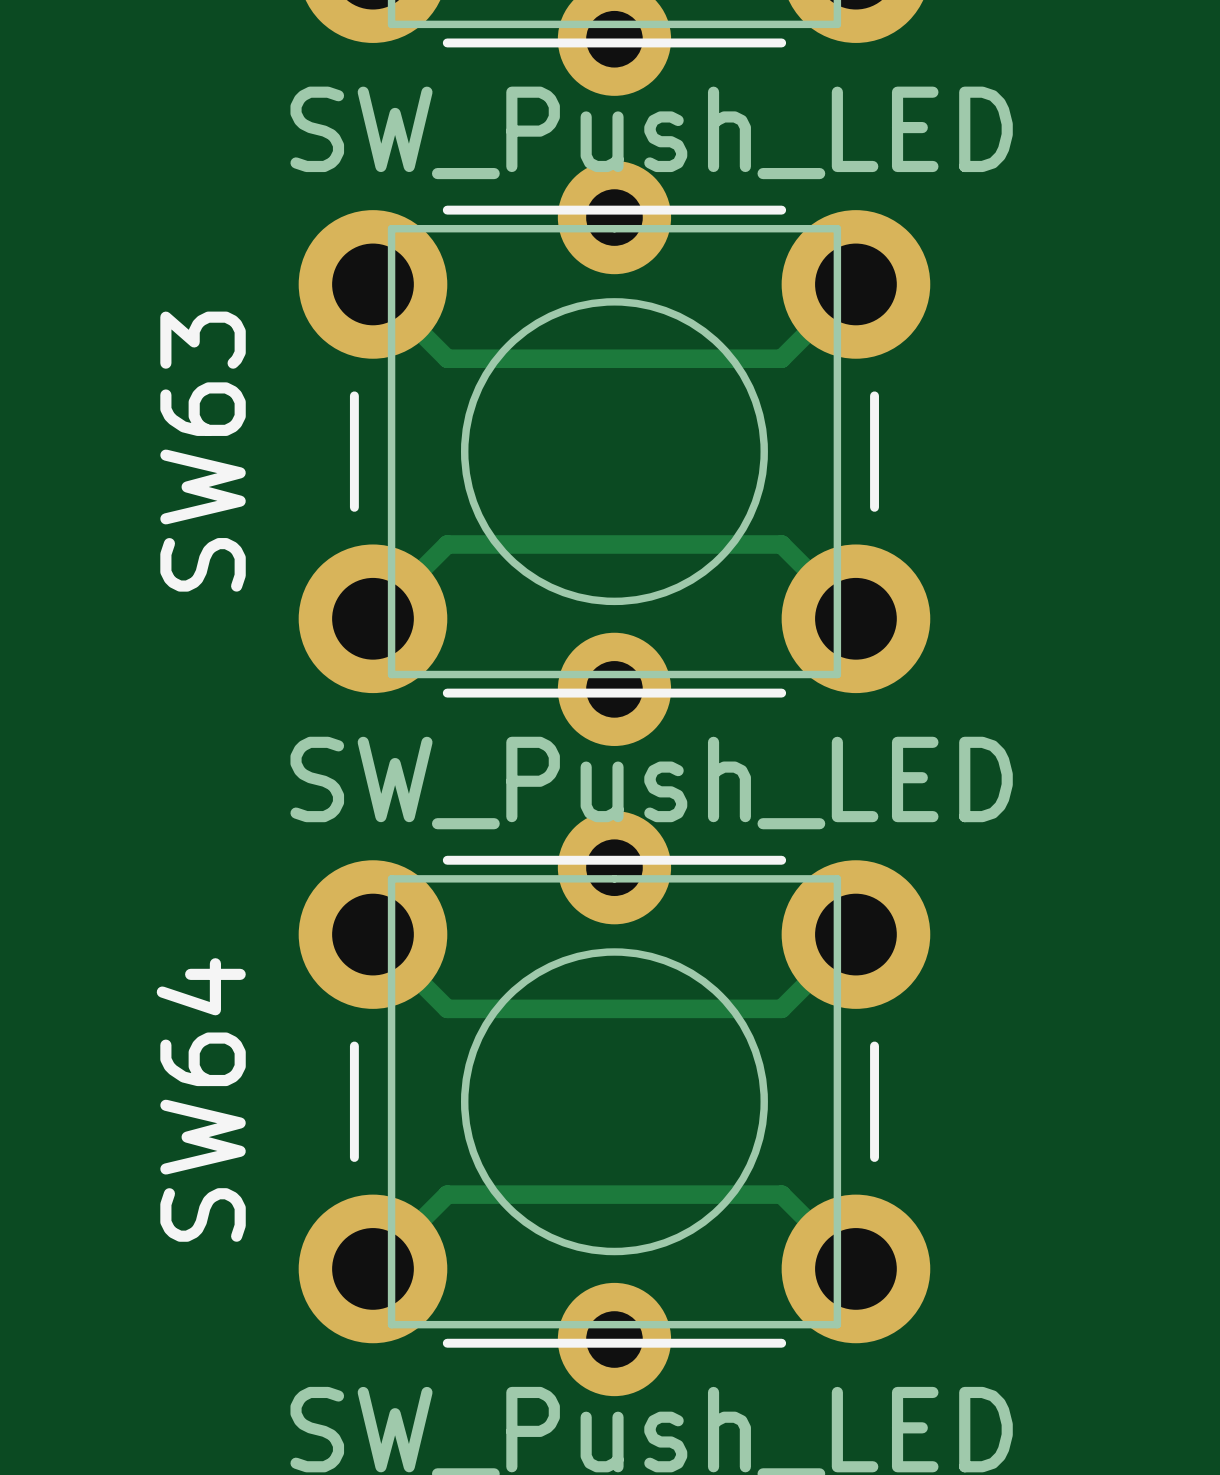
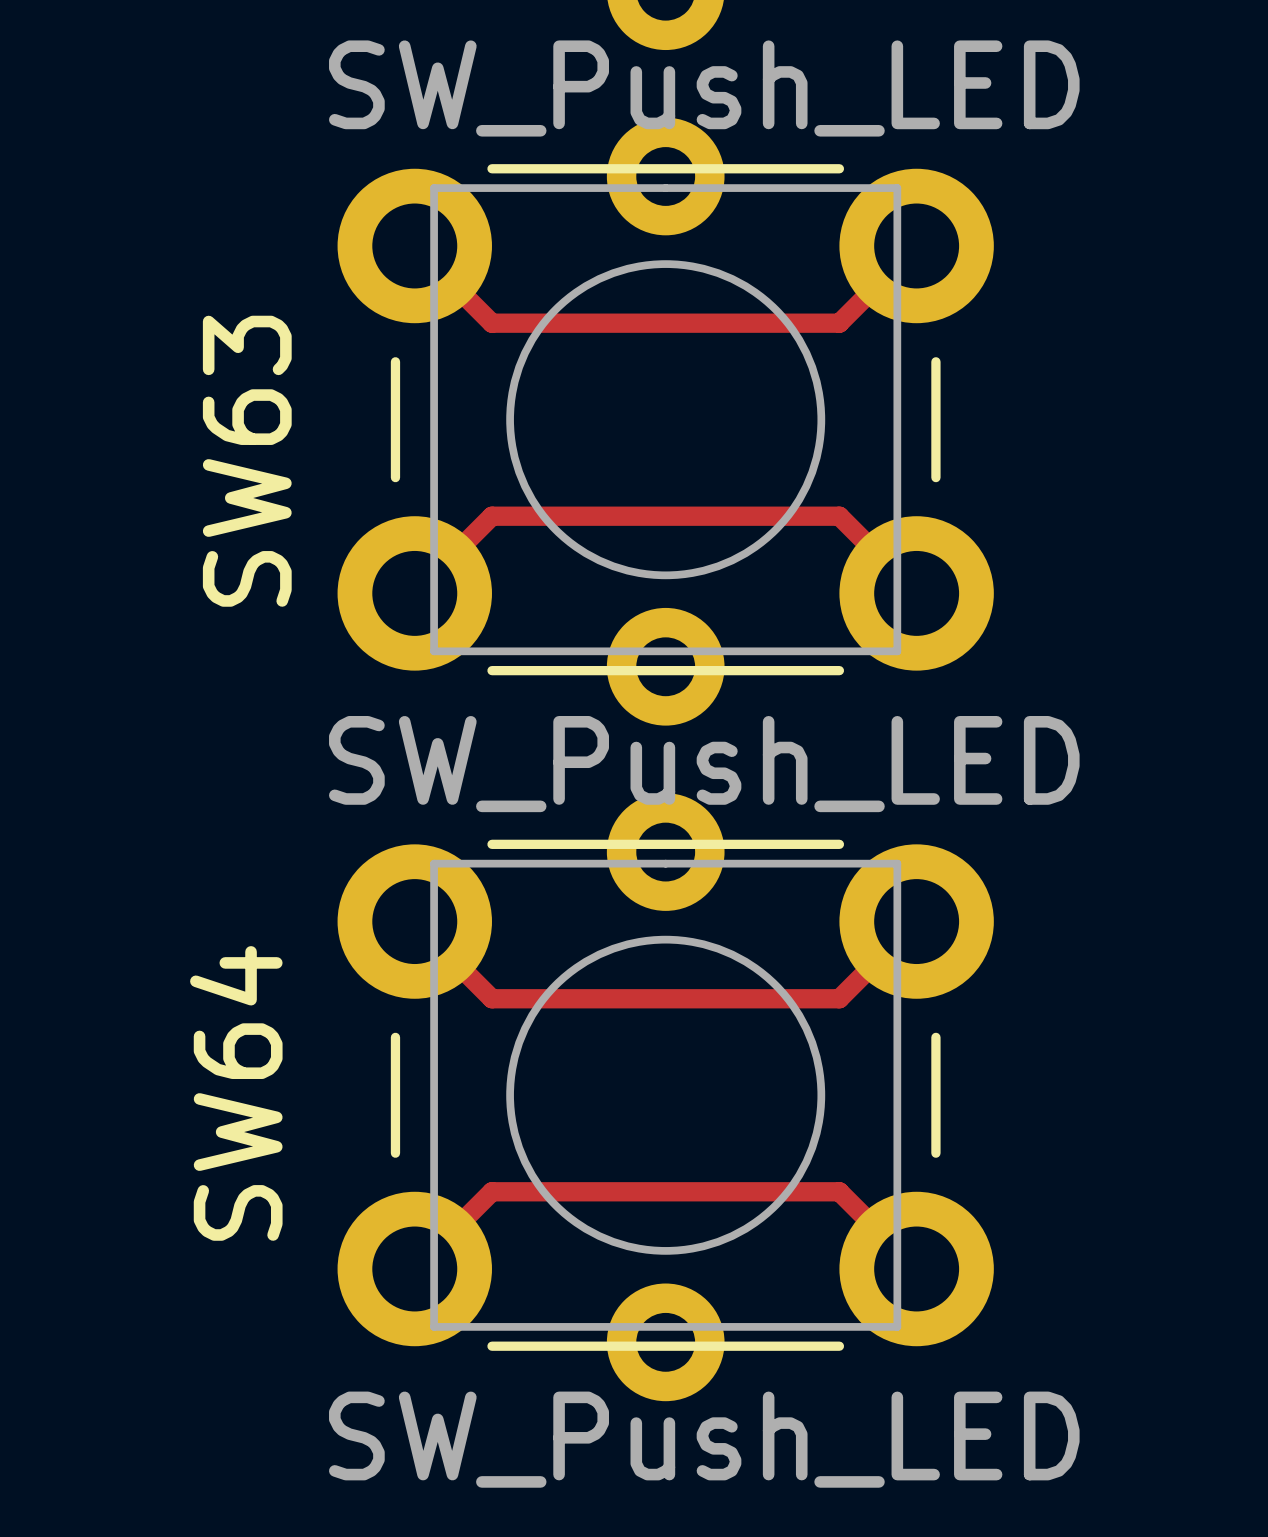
SW63 name position: SW63 (203, 451) -> SW63 (247, 461)

